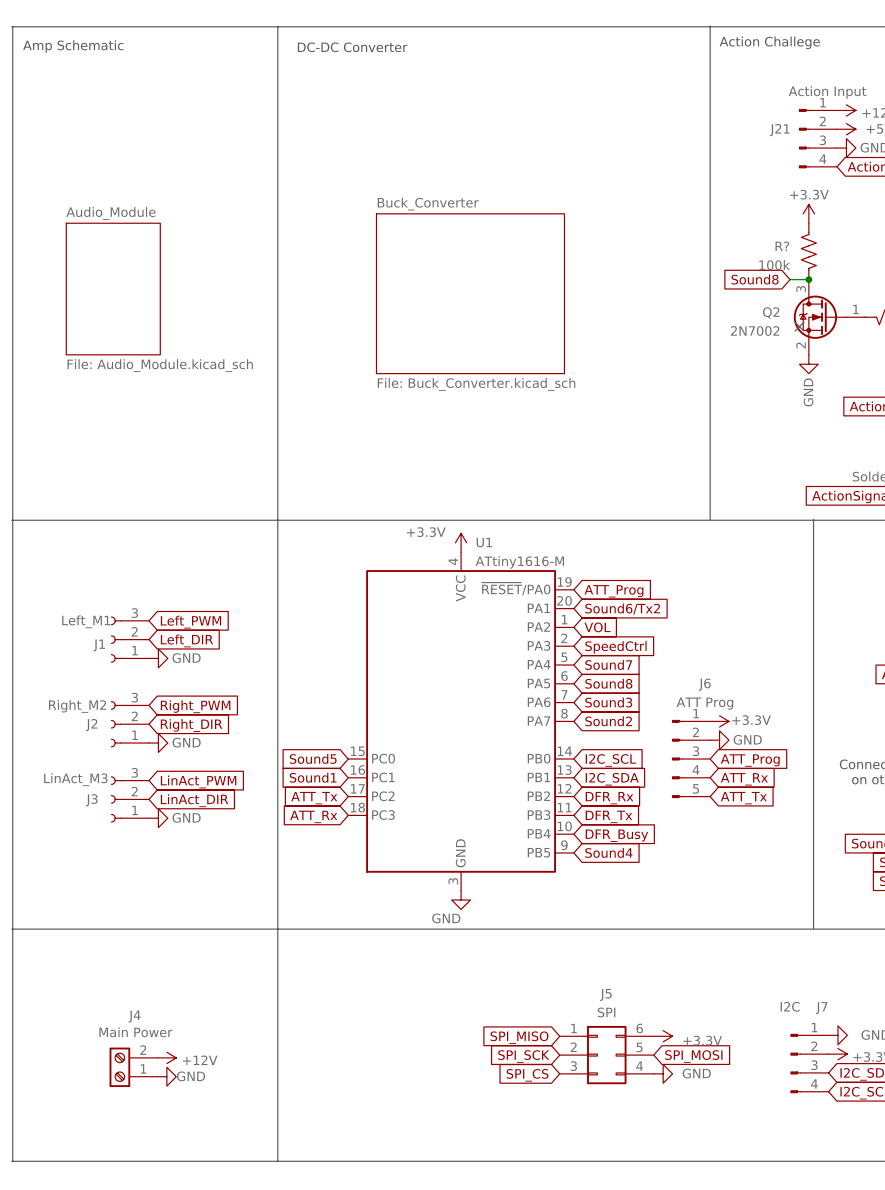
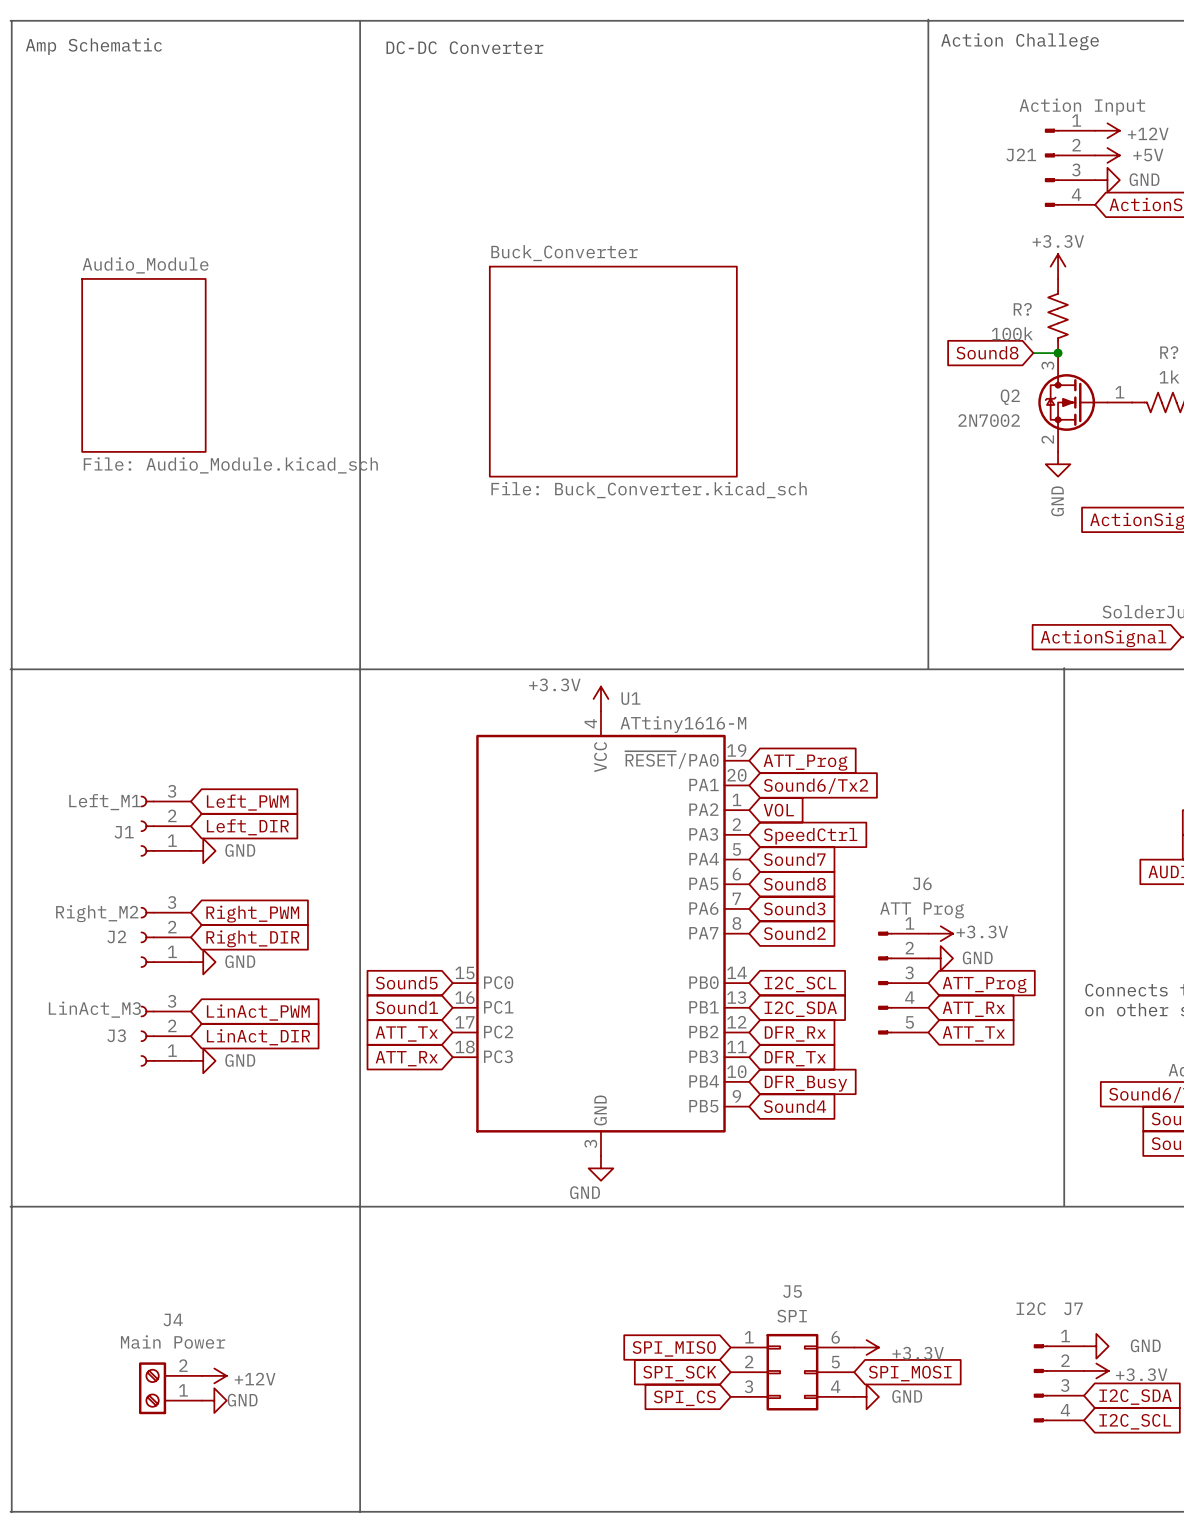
no-connect mark: (799, 326) -> none

